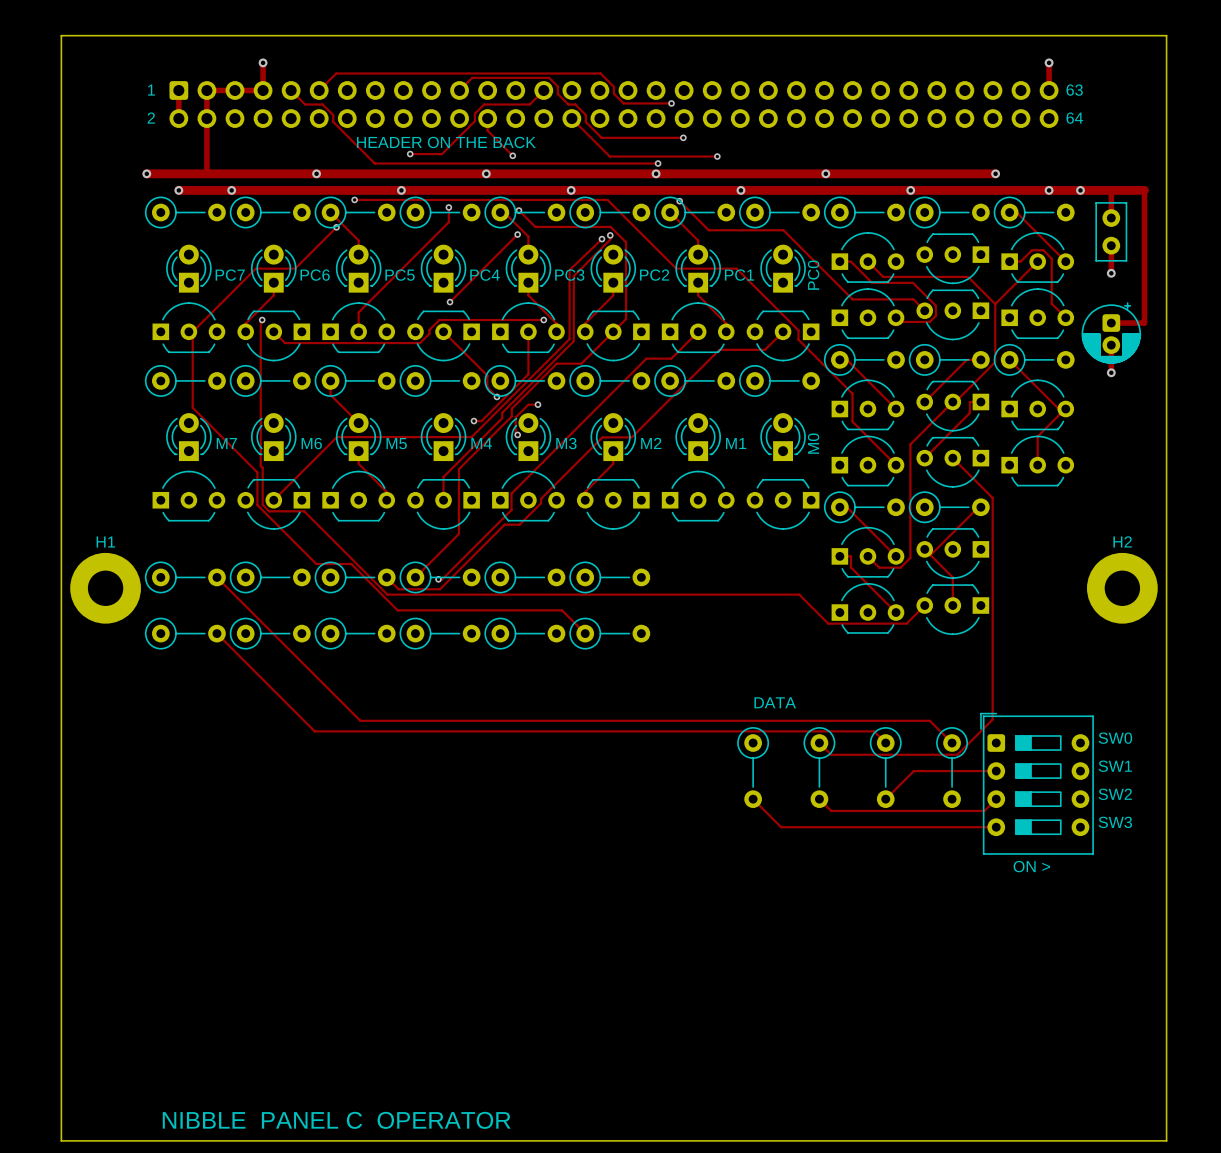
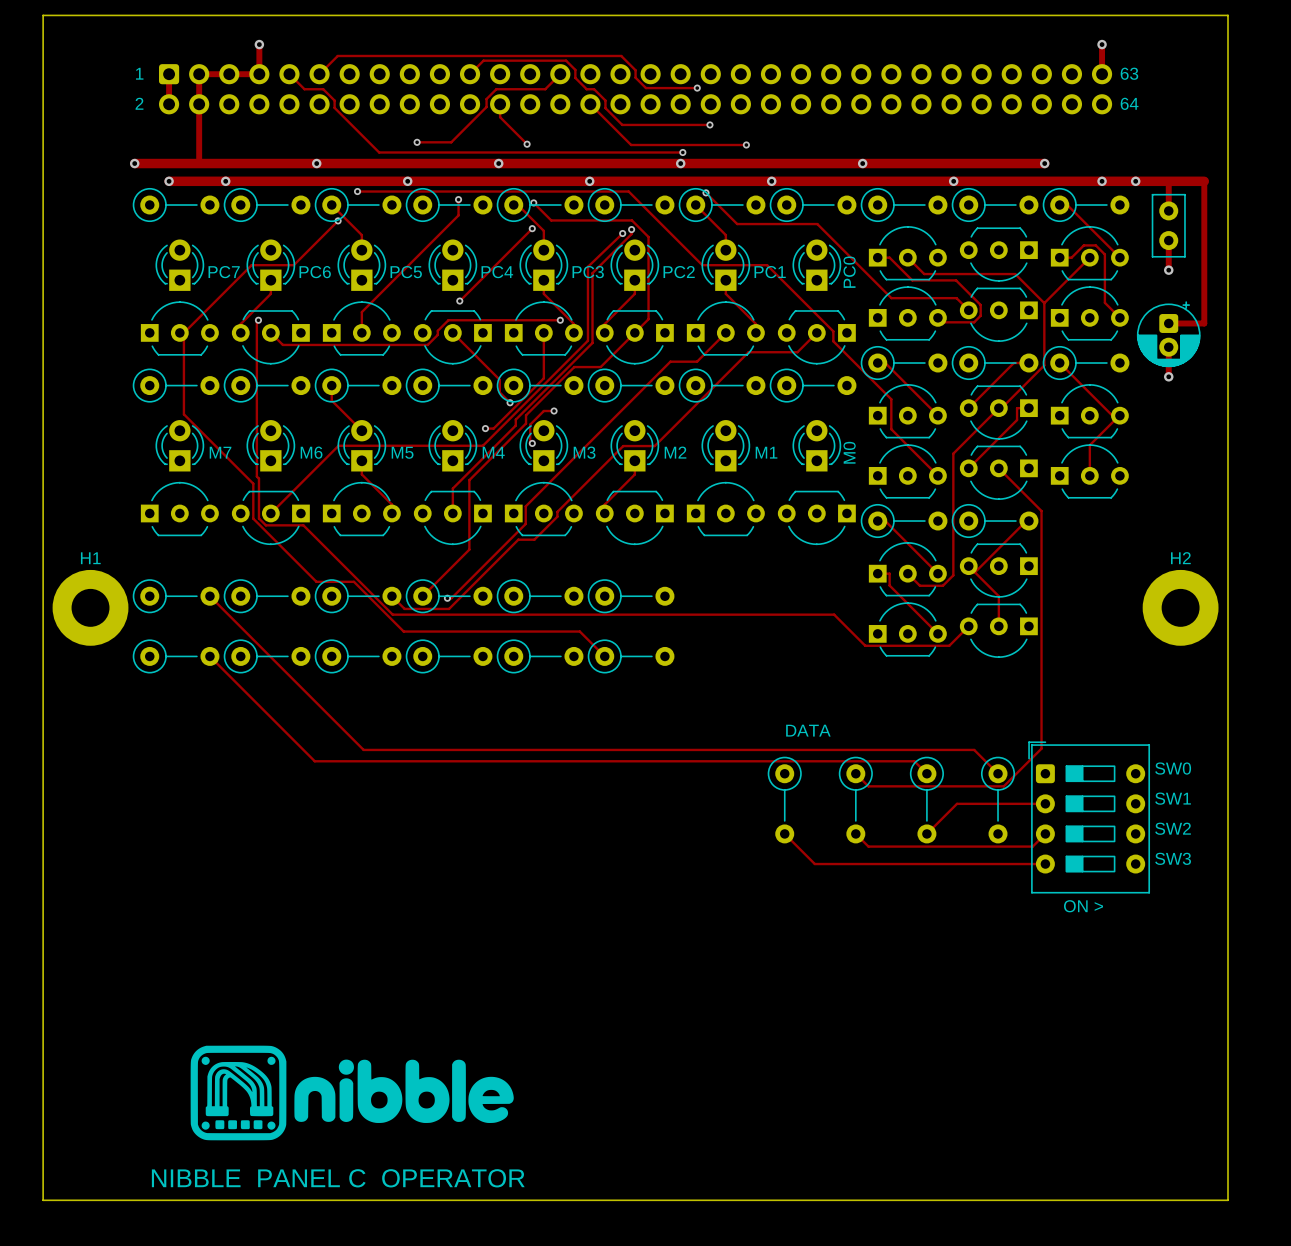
text: HEADER ON THE BACK (446, 142) -> none
drawing: none -> [190, 1045, 514, 1141]

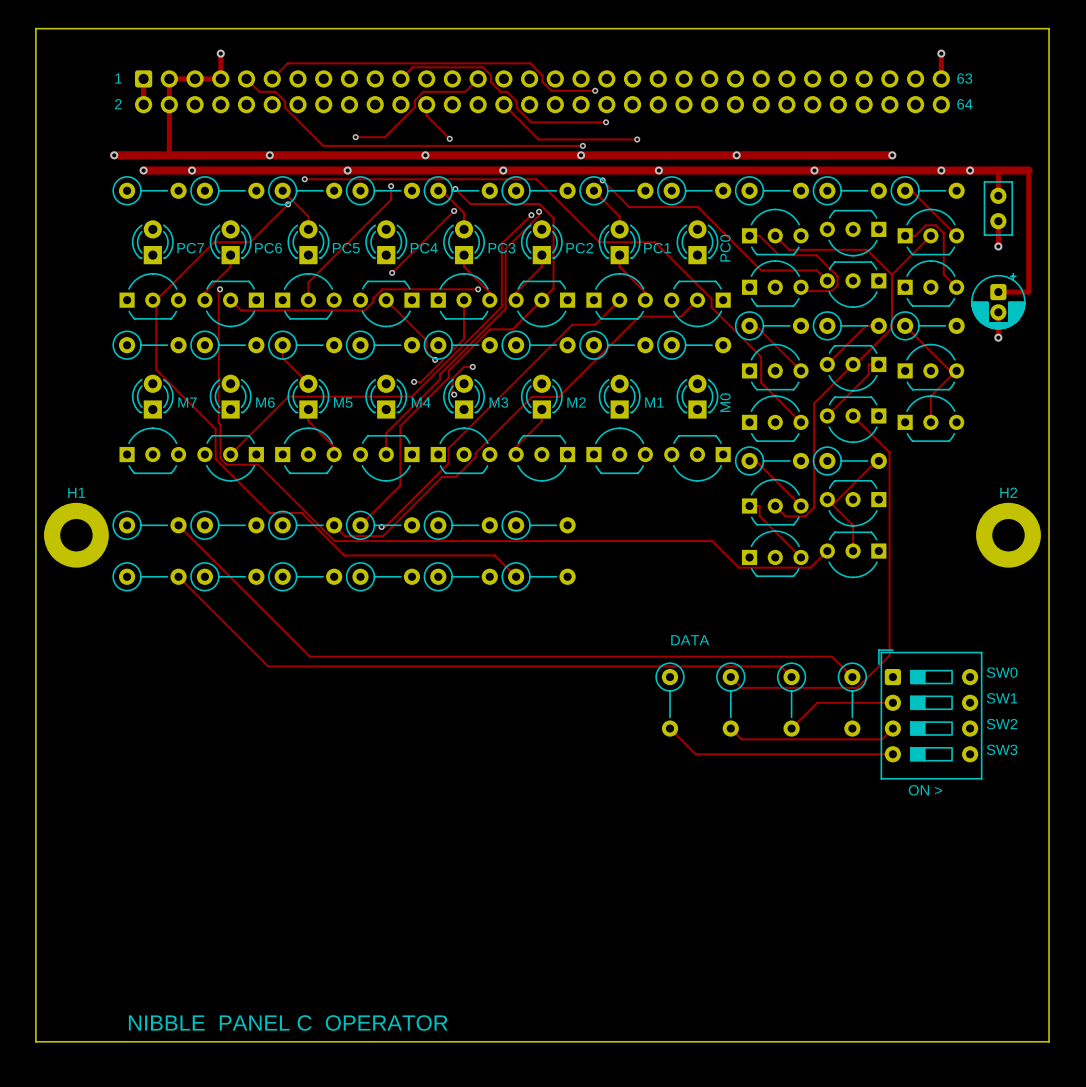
drawing: [190, 1045, 514, 1141] -> none

